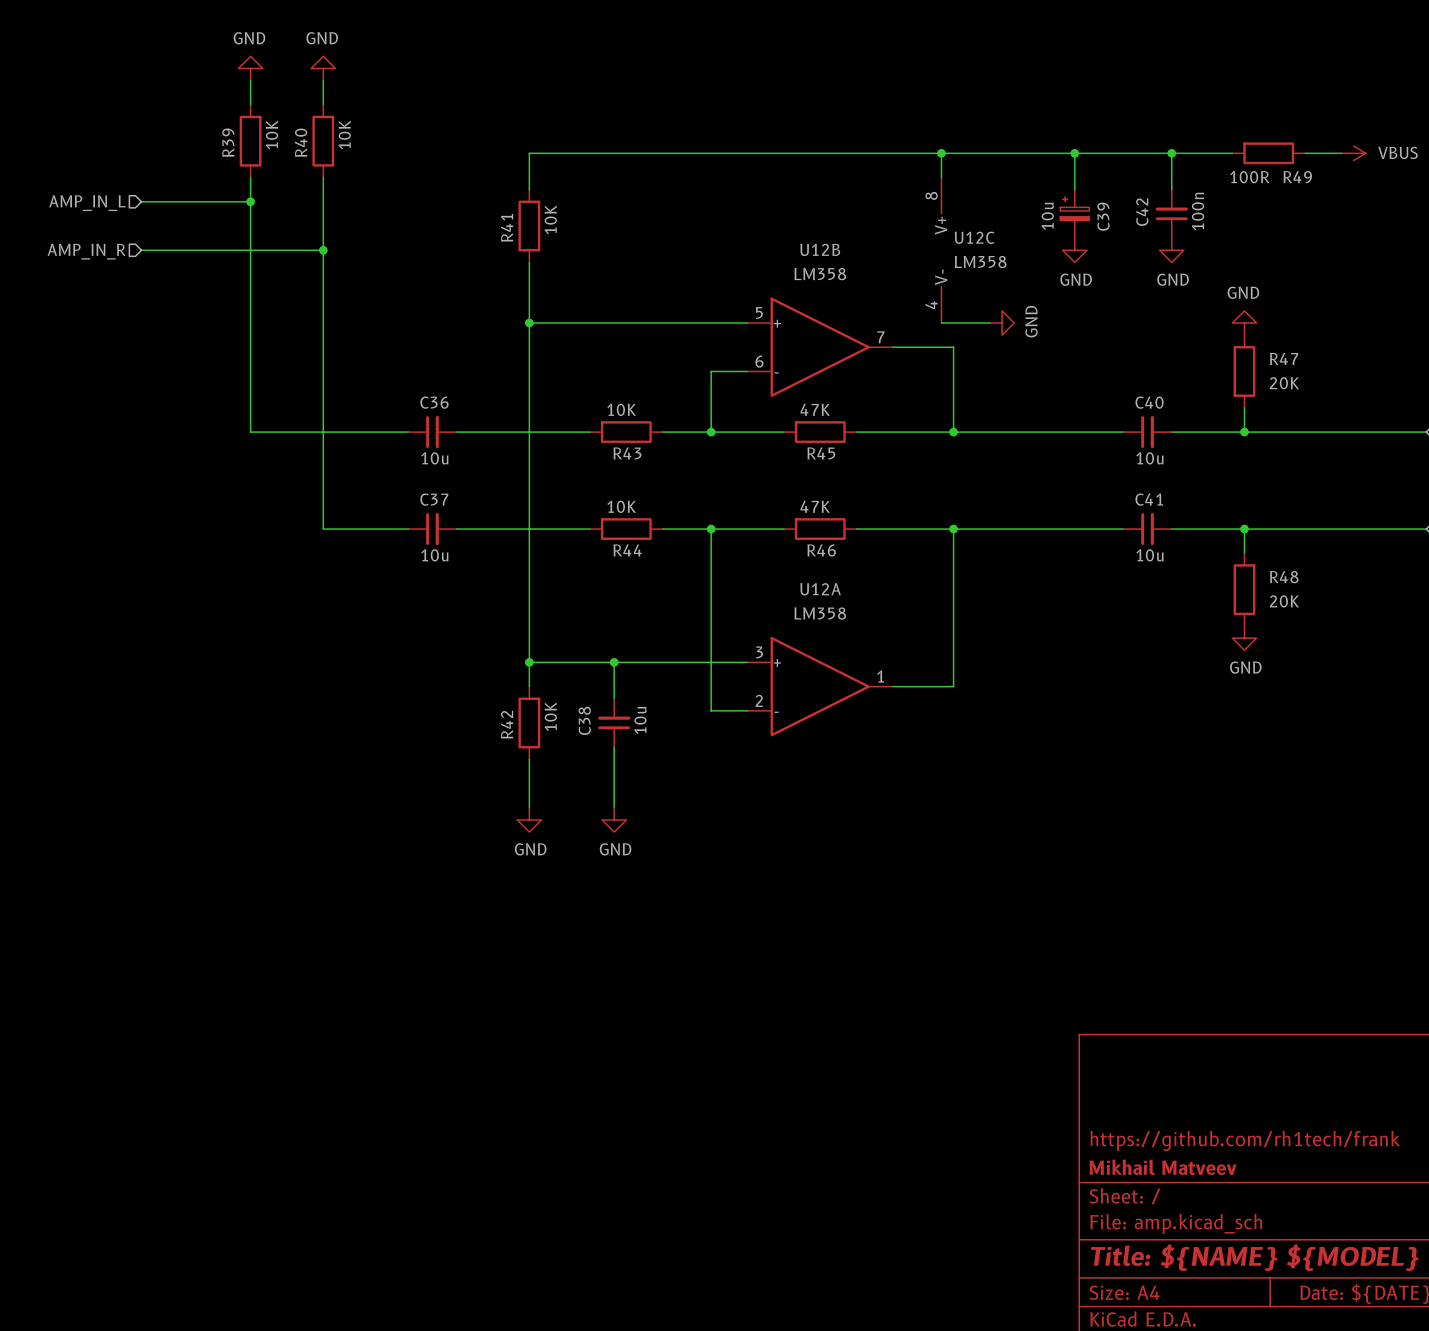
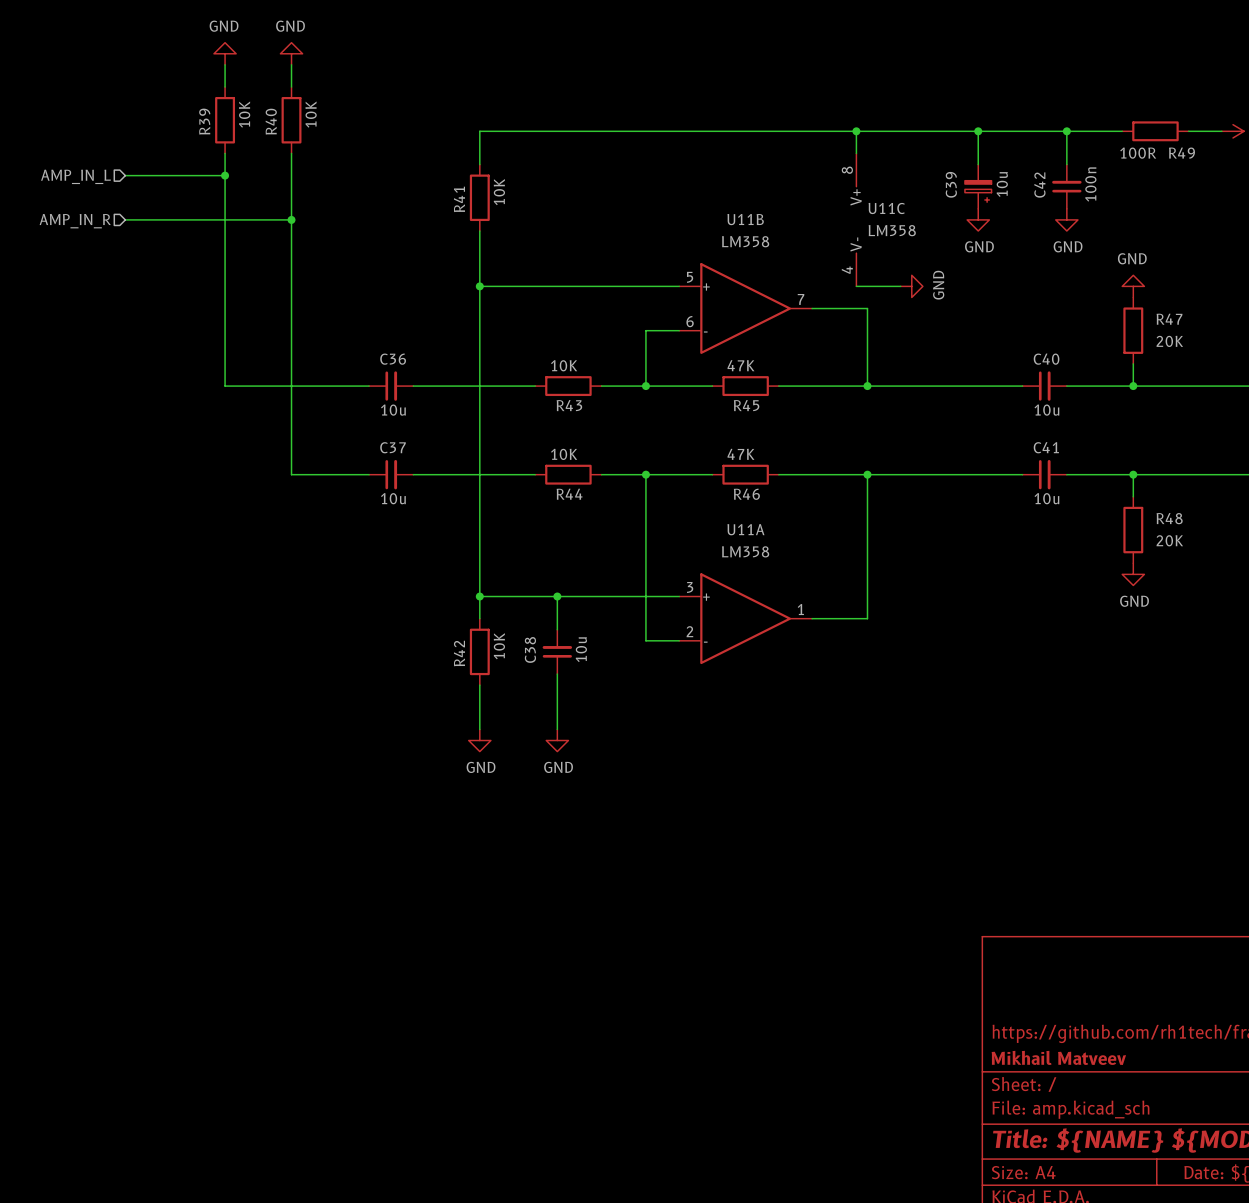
C39 rotation: 0° (1074, 208) -> 180° (978, 191)
U12C name: U12C (974, 237) -> U11C (886, 208)
U12B name: U12B (820, 249) -> U11B (745, 219)
U12A name: U12A (820, 589) -> U11A (745, 529)

